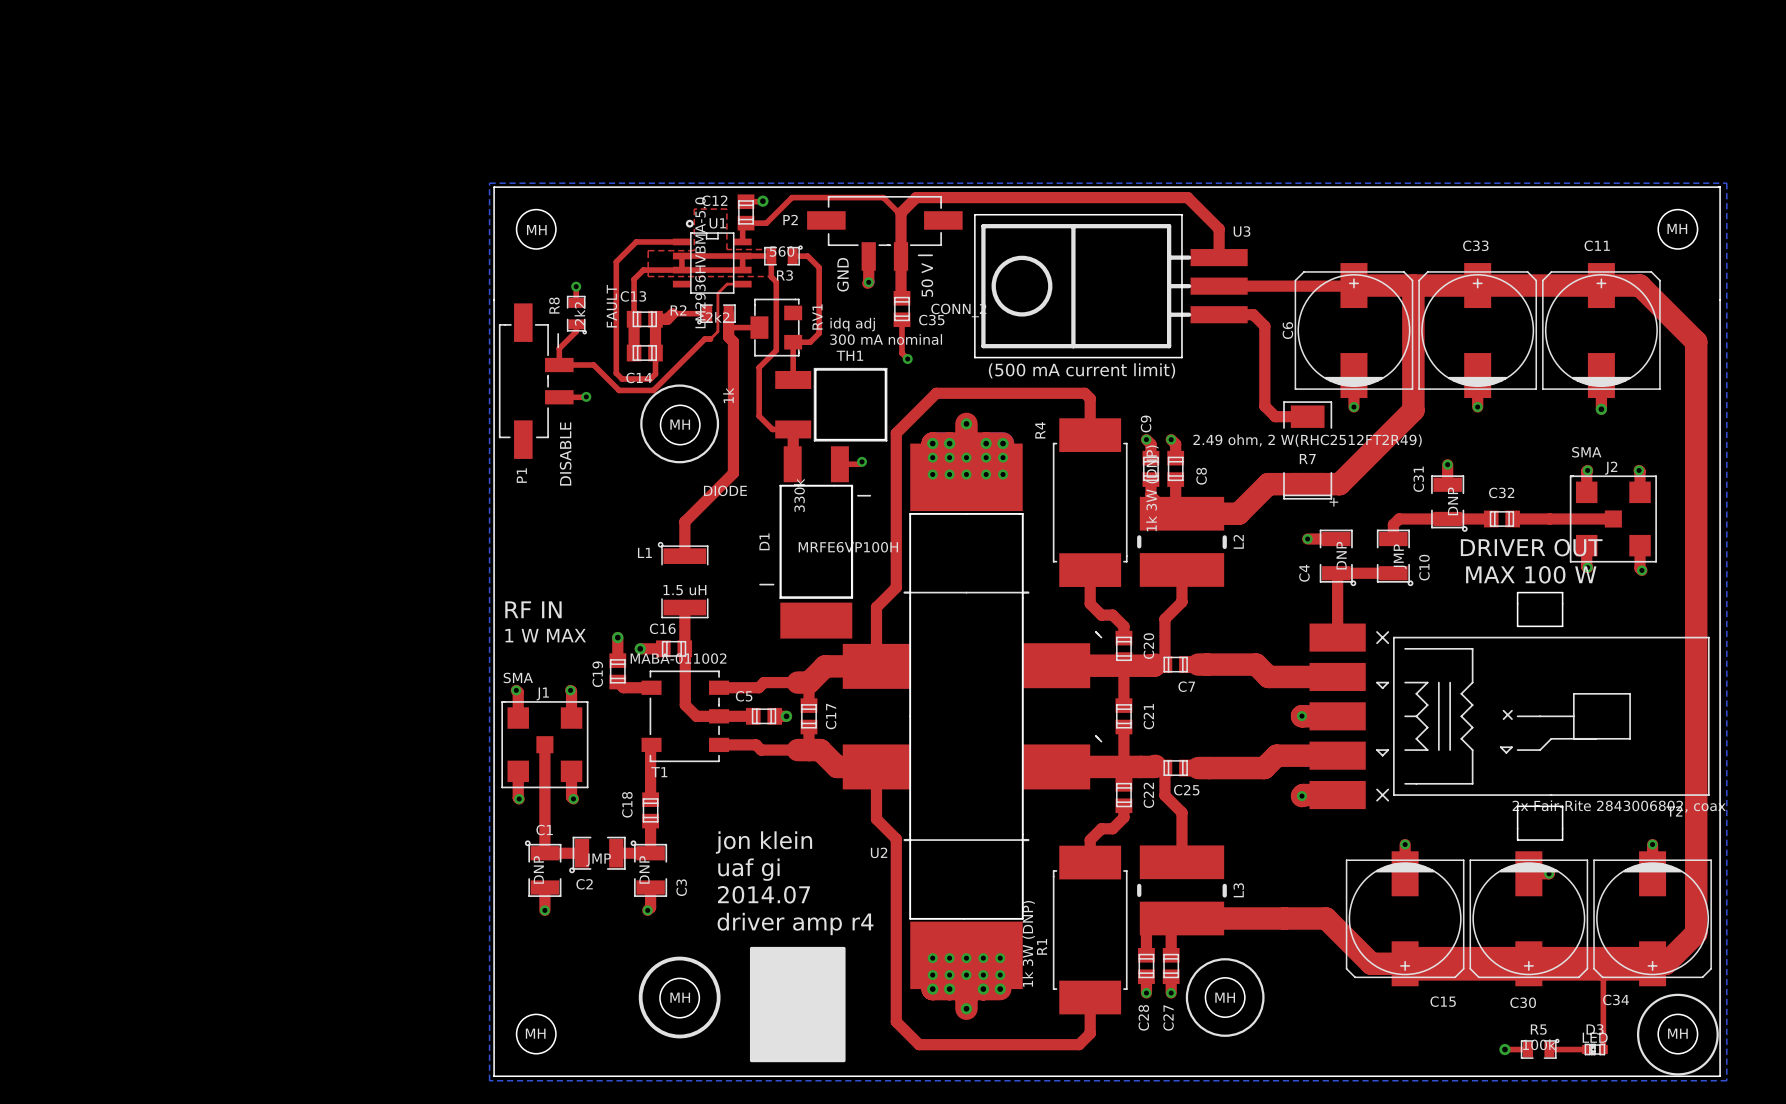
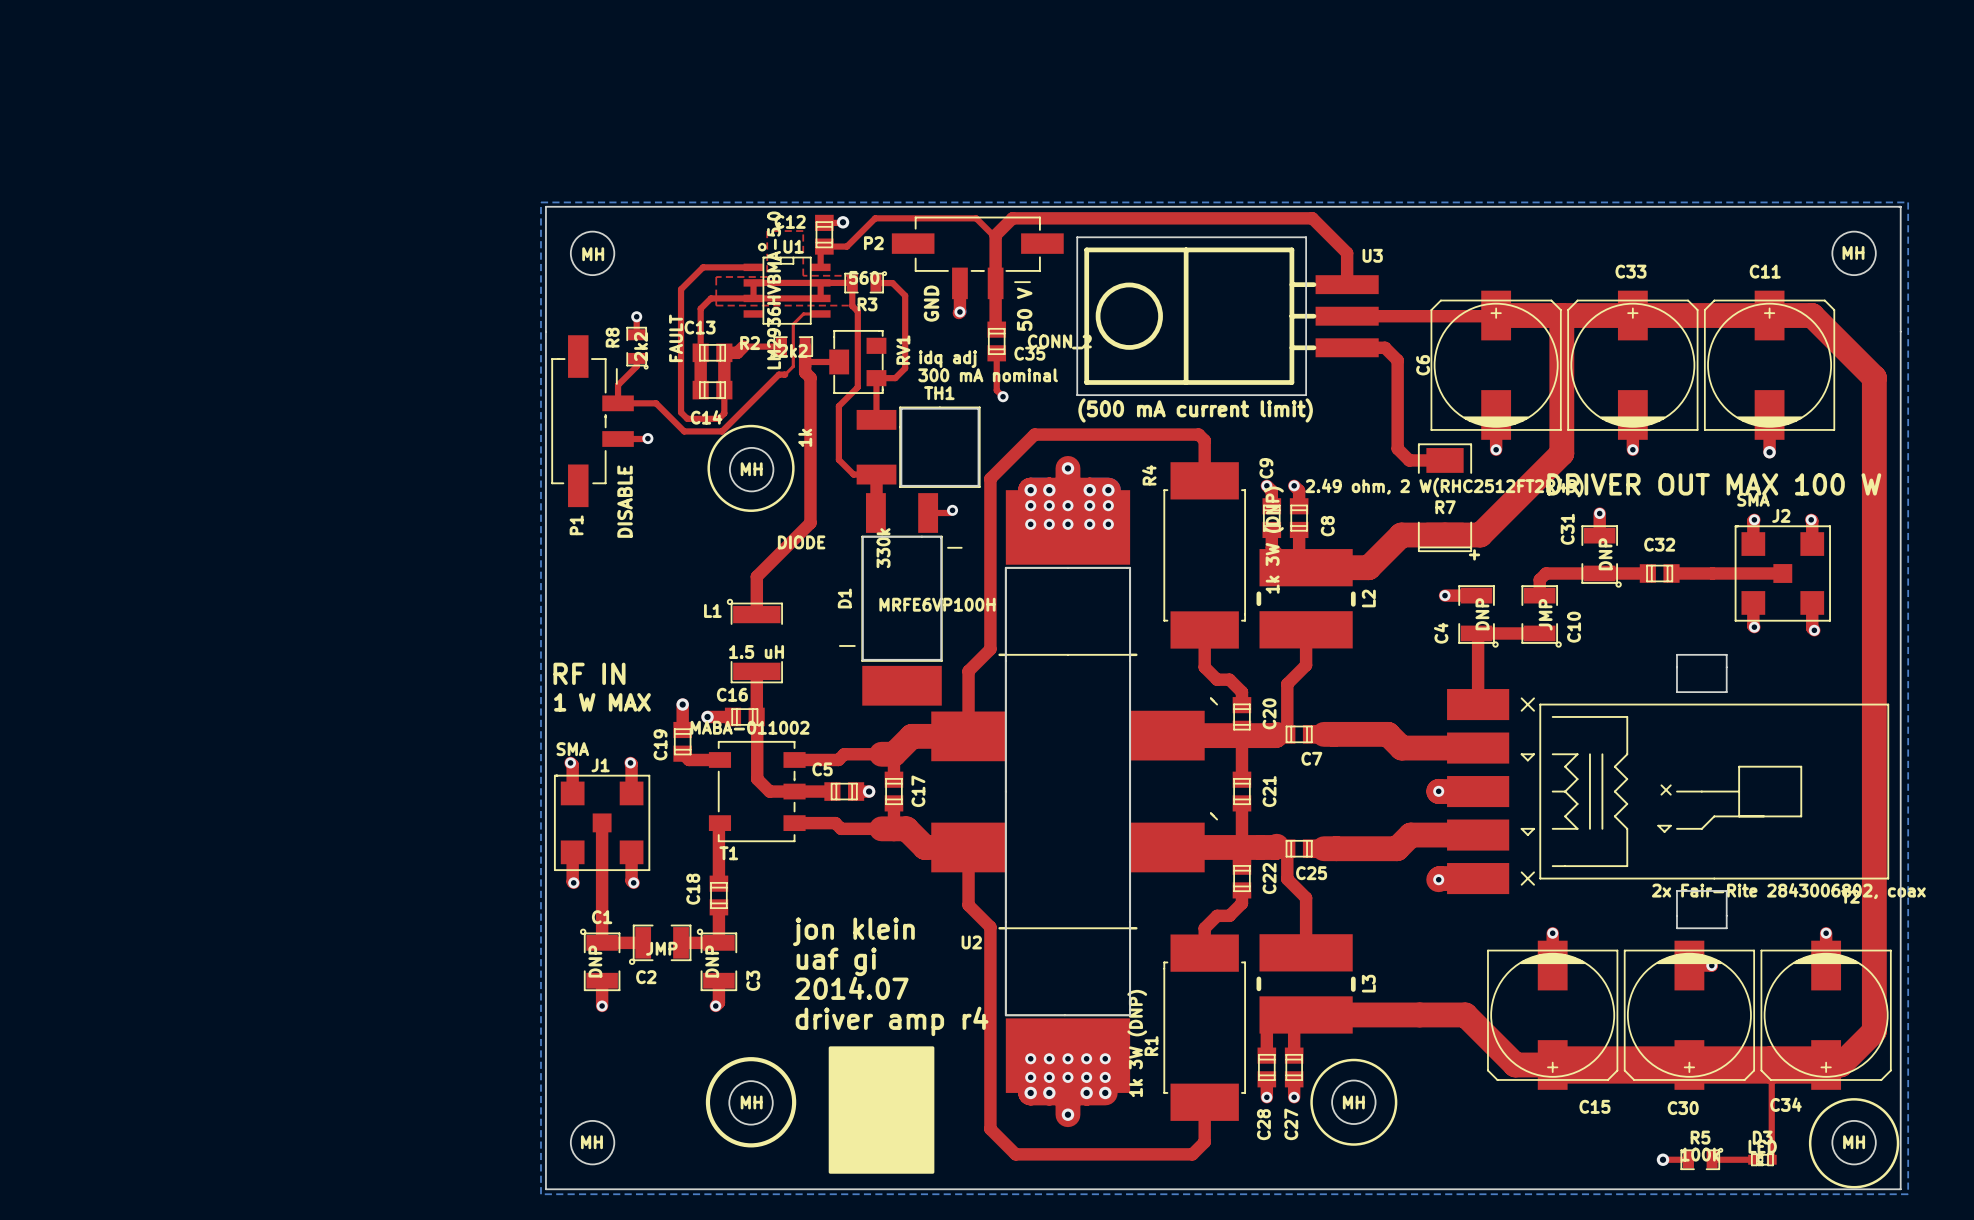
text: none -> DRIVER OUT MAX 100 W (1714, 484)
text: DRIVER OUT (1531, 547) -> none
text: MAX 100 W (1531, 574) -> none

